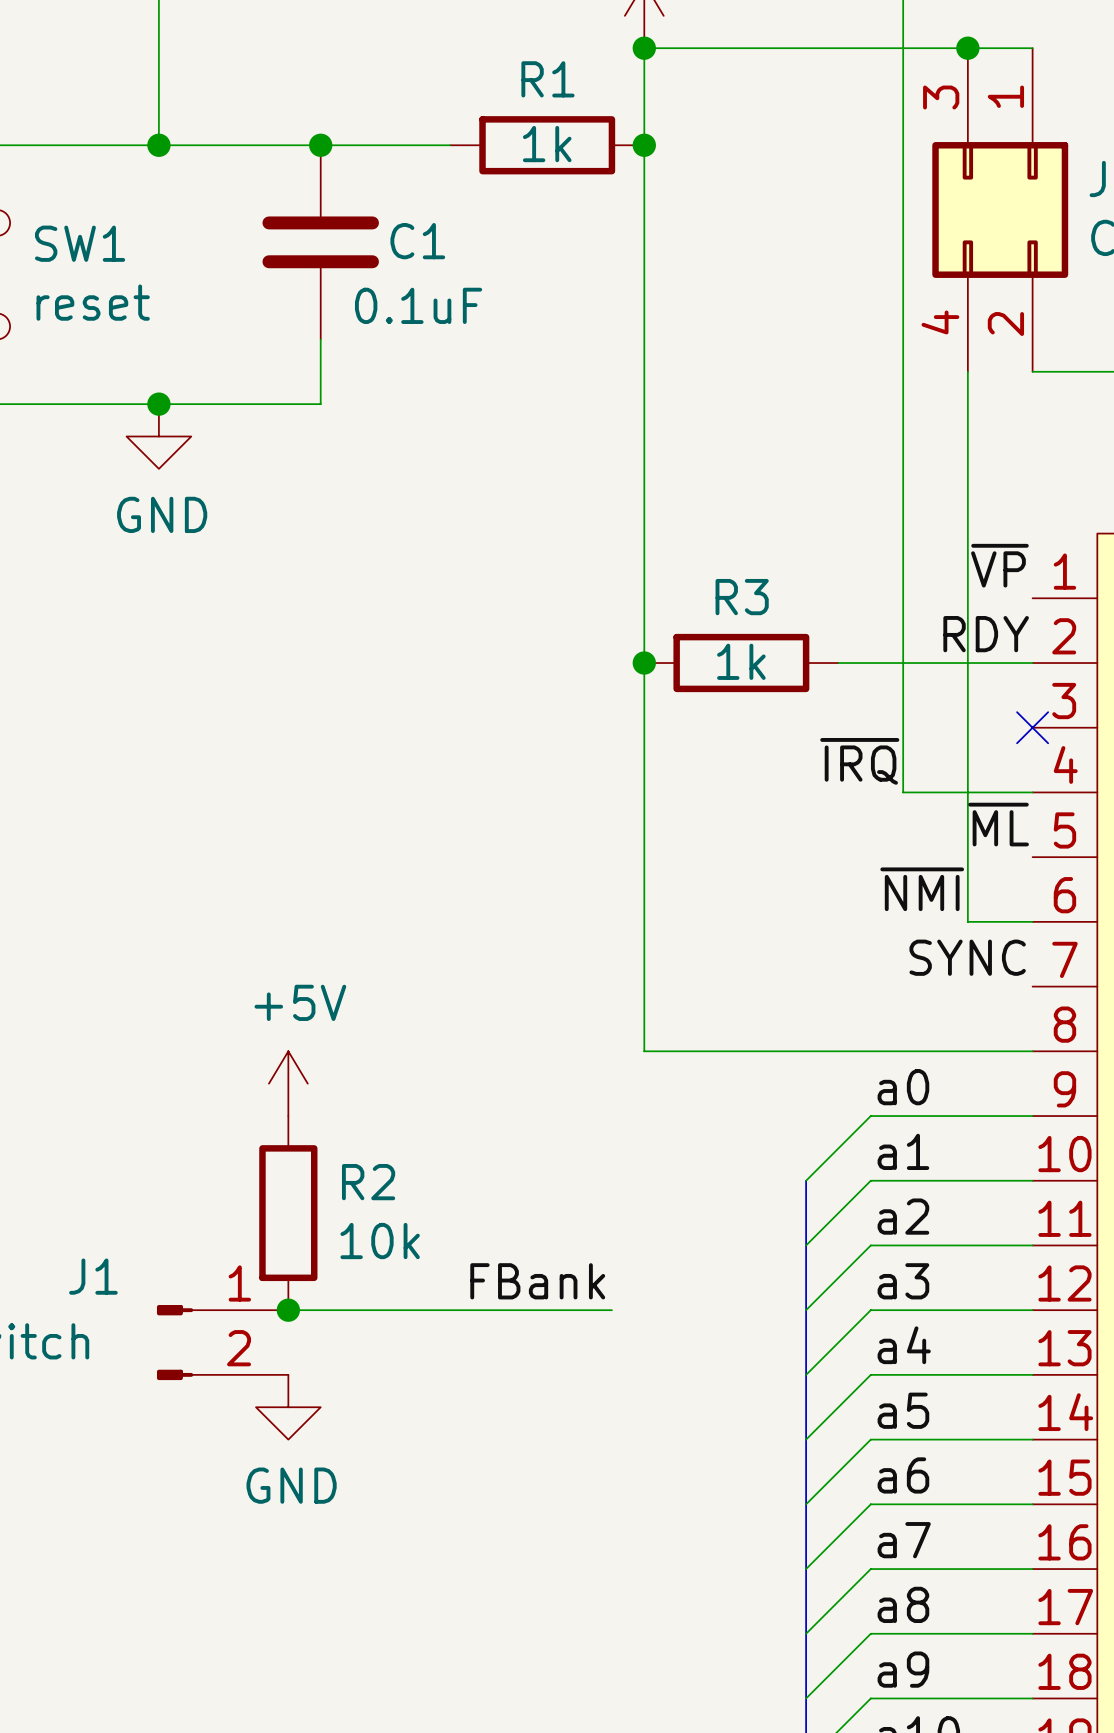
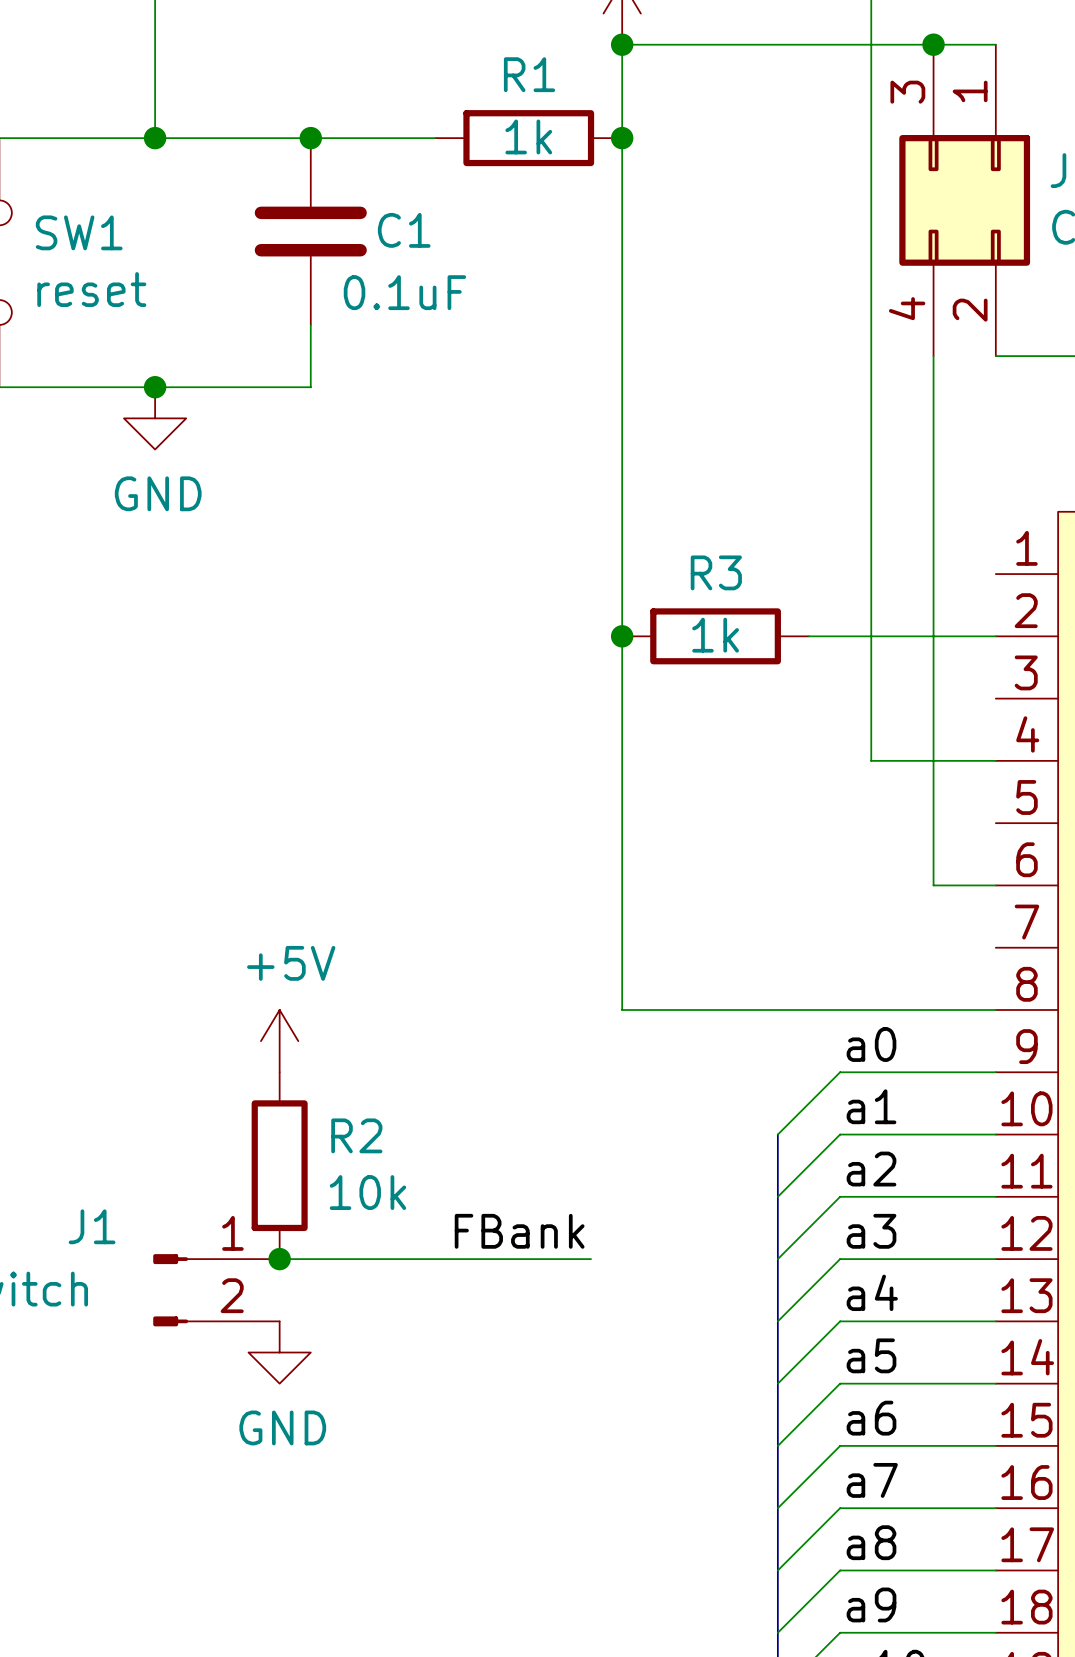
label: ~{VP} (999, 565) -> none
label: RDY (986, 634) -> none
no-connect mark: (1032, 727) -> none
label: ~{IRQ} (859, 761) -> none
label: ~{ML} (998, 824) -> none
label: ~{NMI} (922, 889) -> none
label: SYNC (967, 957) -> none

